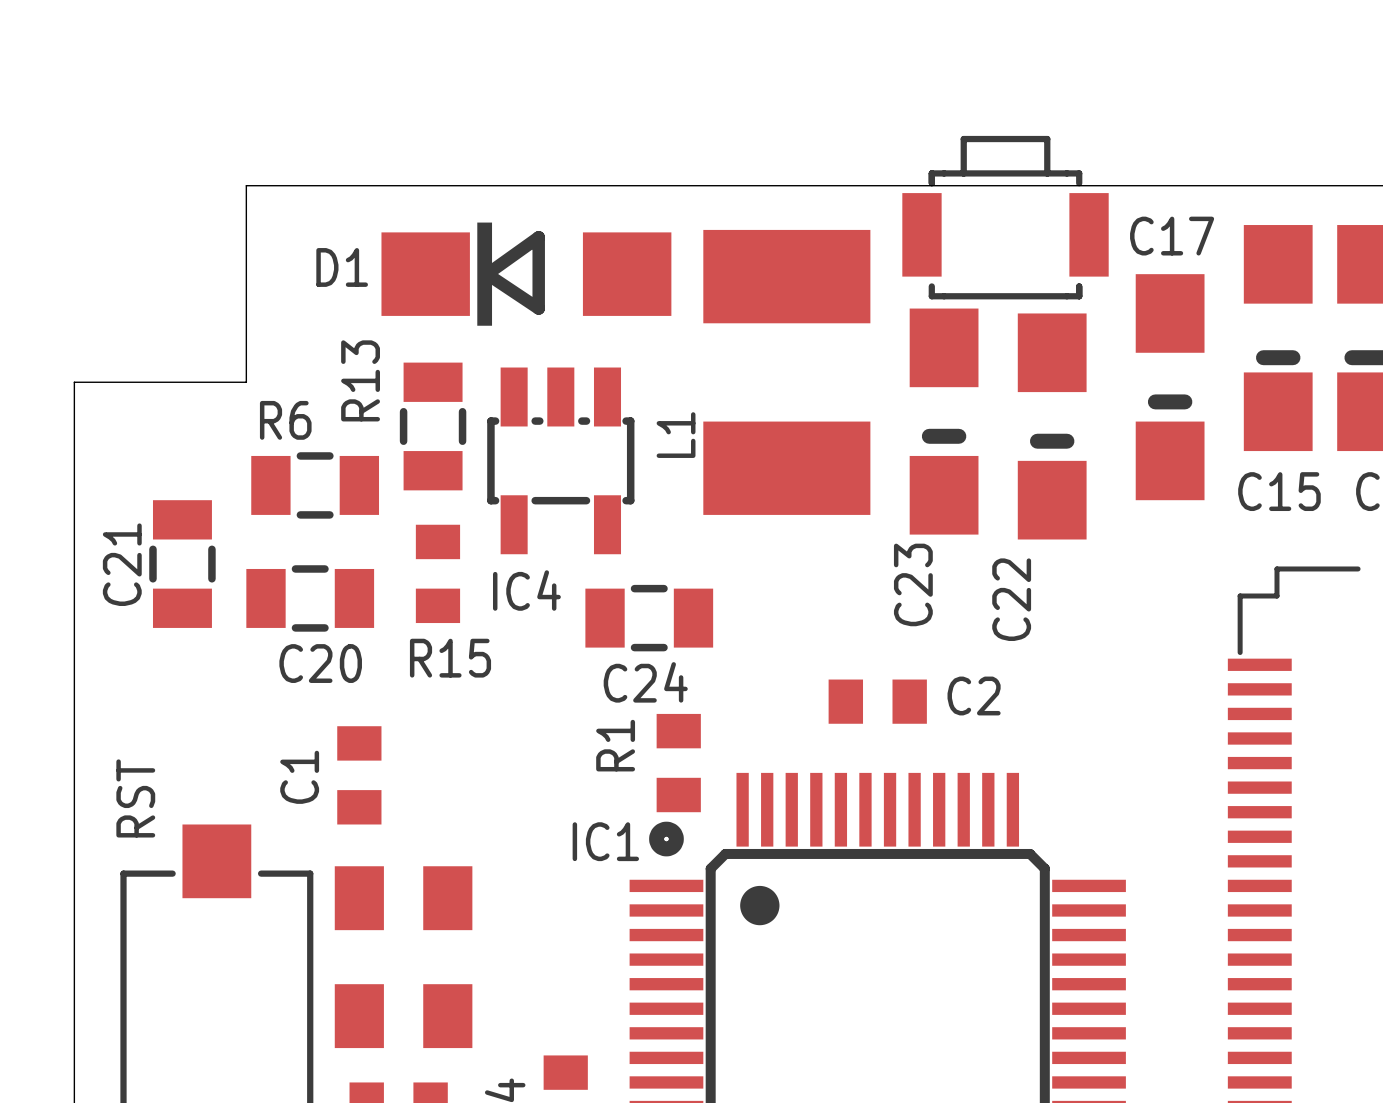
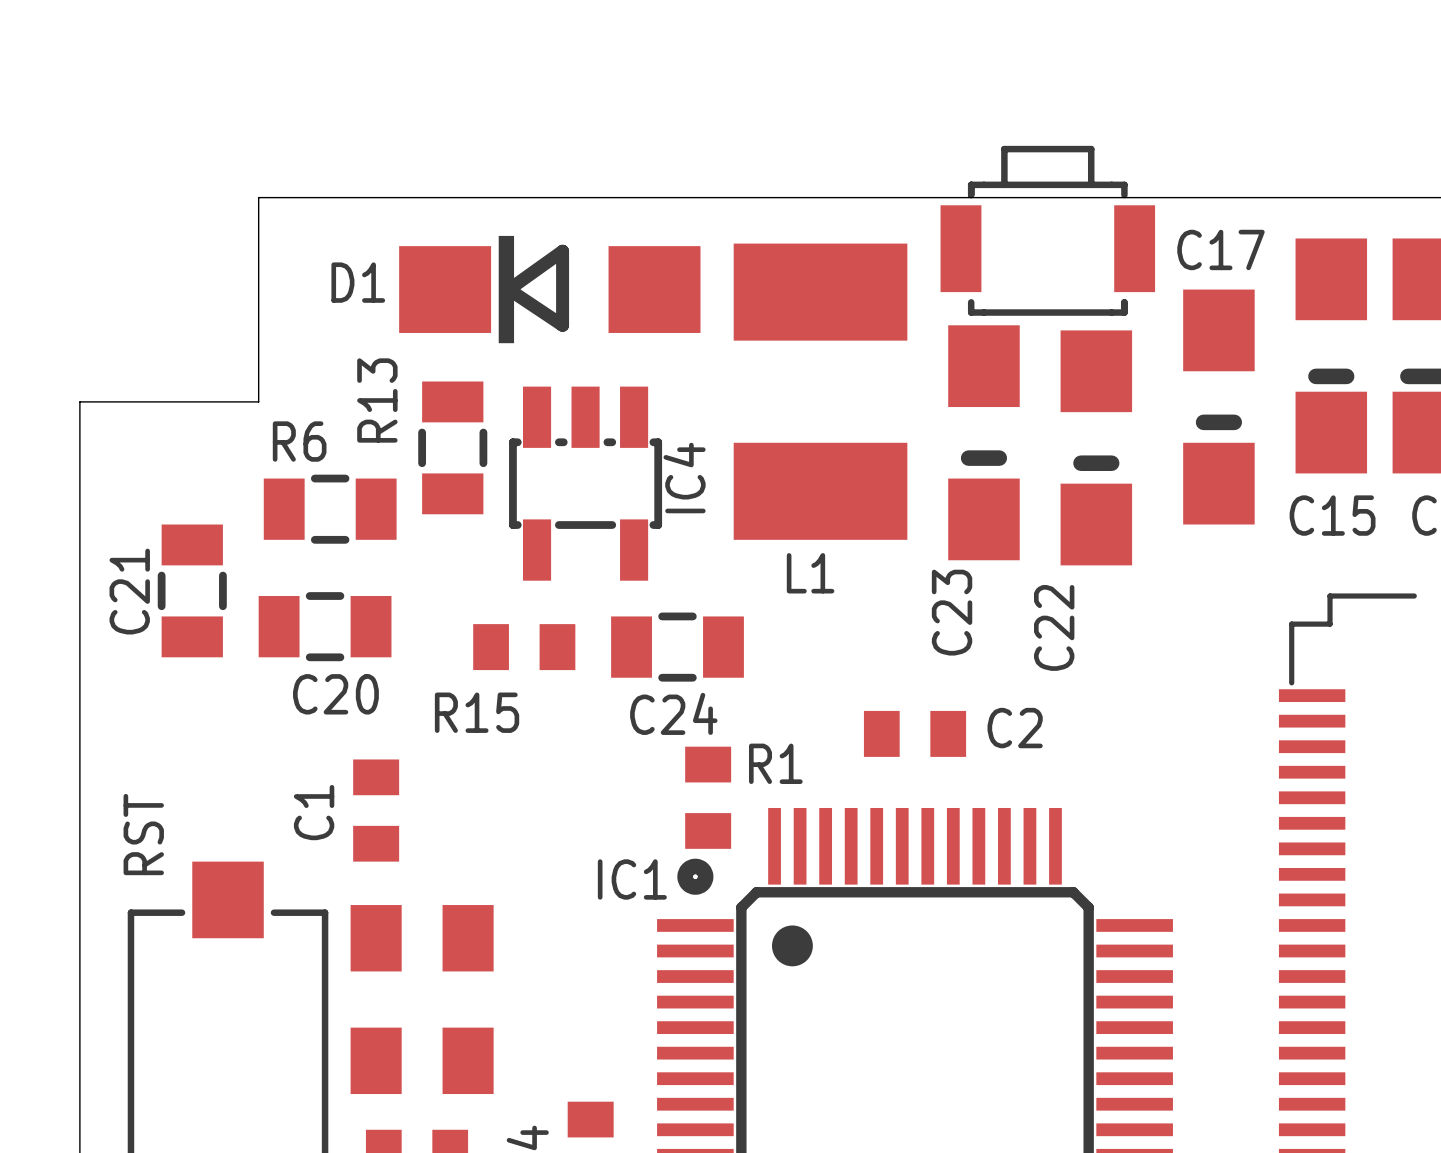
L1 name rotation: 0° (676, 435) -> 90° clockwise (810, 573)
L1 name position: L1 (676, 435) -> L1 (810, 573)
R15 rotation: 0° (437, 573) -> 90° clockwise (524, 647)
R15 position: (437, 573) -> (524, 647)
IC4 name rotation: 0° (526, 590) -> 90° counterclockwise (684, 478)
IC4 name position: IC4 (526, 590) -> IC4 (684, 478)
R1 name rotation: 0° (615, 745) -> 90° clockwise (775, 763)
R1 name position: R1 (615, 745) -> R1 (775, 763)

